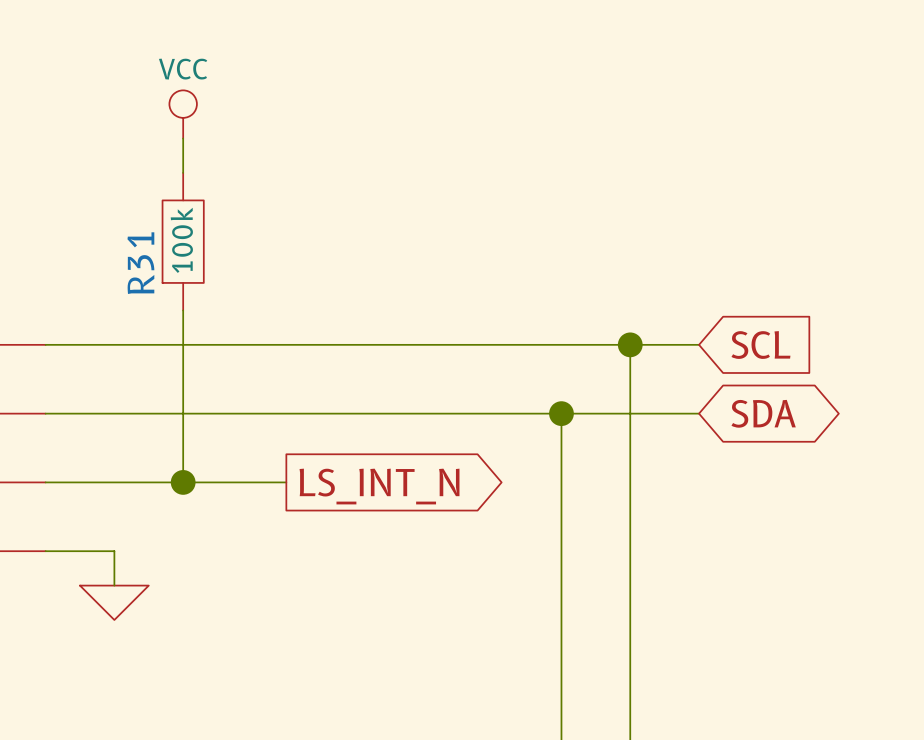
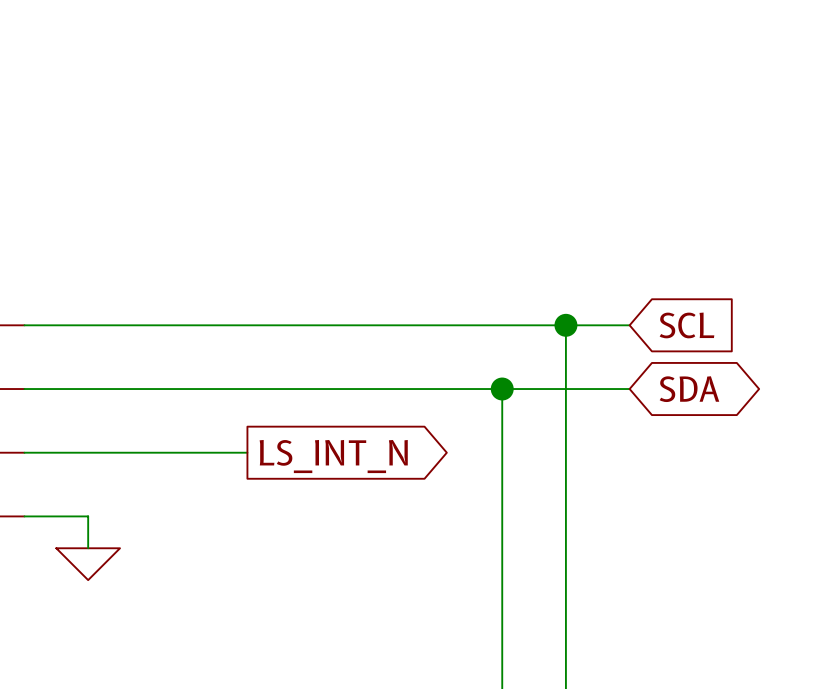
power symbol: VCC (183, 114) -> none
wire: (183, 138) (183, 172) -> none
R31: 100k (183, 241) -> none
wire: (183, 310) (183, 482) -> none
junction: (183, 482) -> none

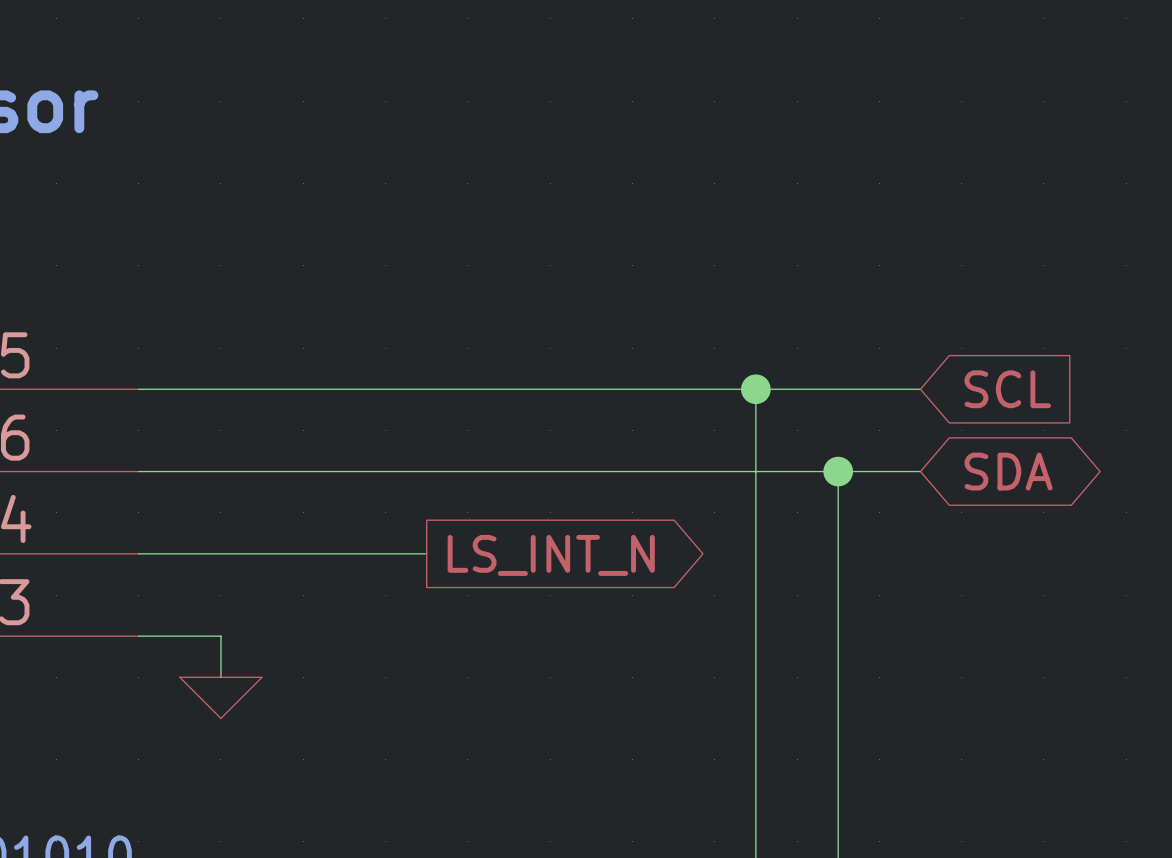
junction: none -> (755, 389)
wire: (565, 325) (565, 389) -> (755, 389) (755, 471)
junction: (565, 325) -> none
junction: (502, 389) -> none
junction: none -> (838, 471)

